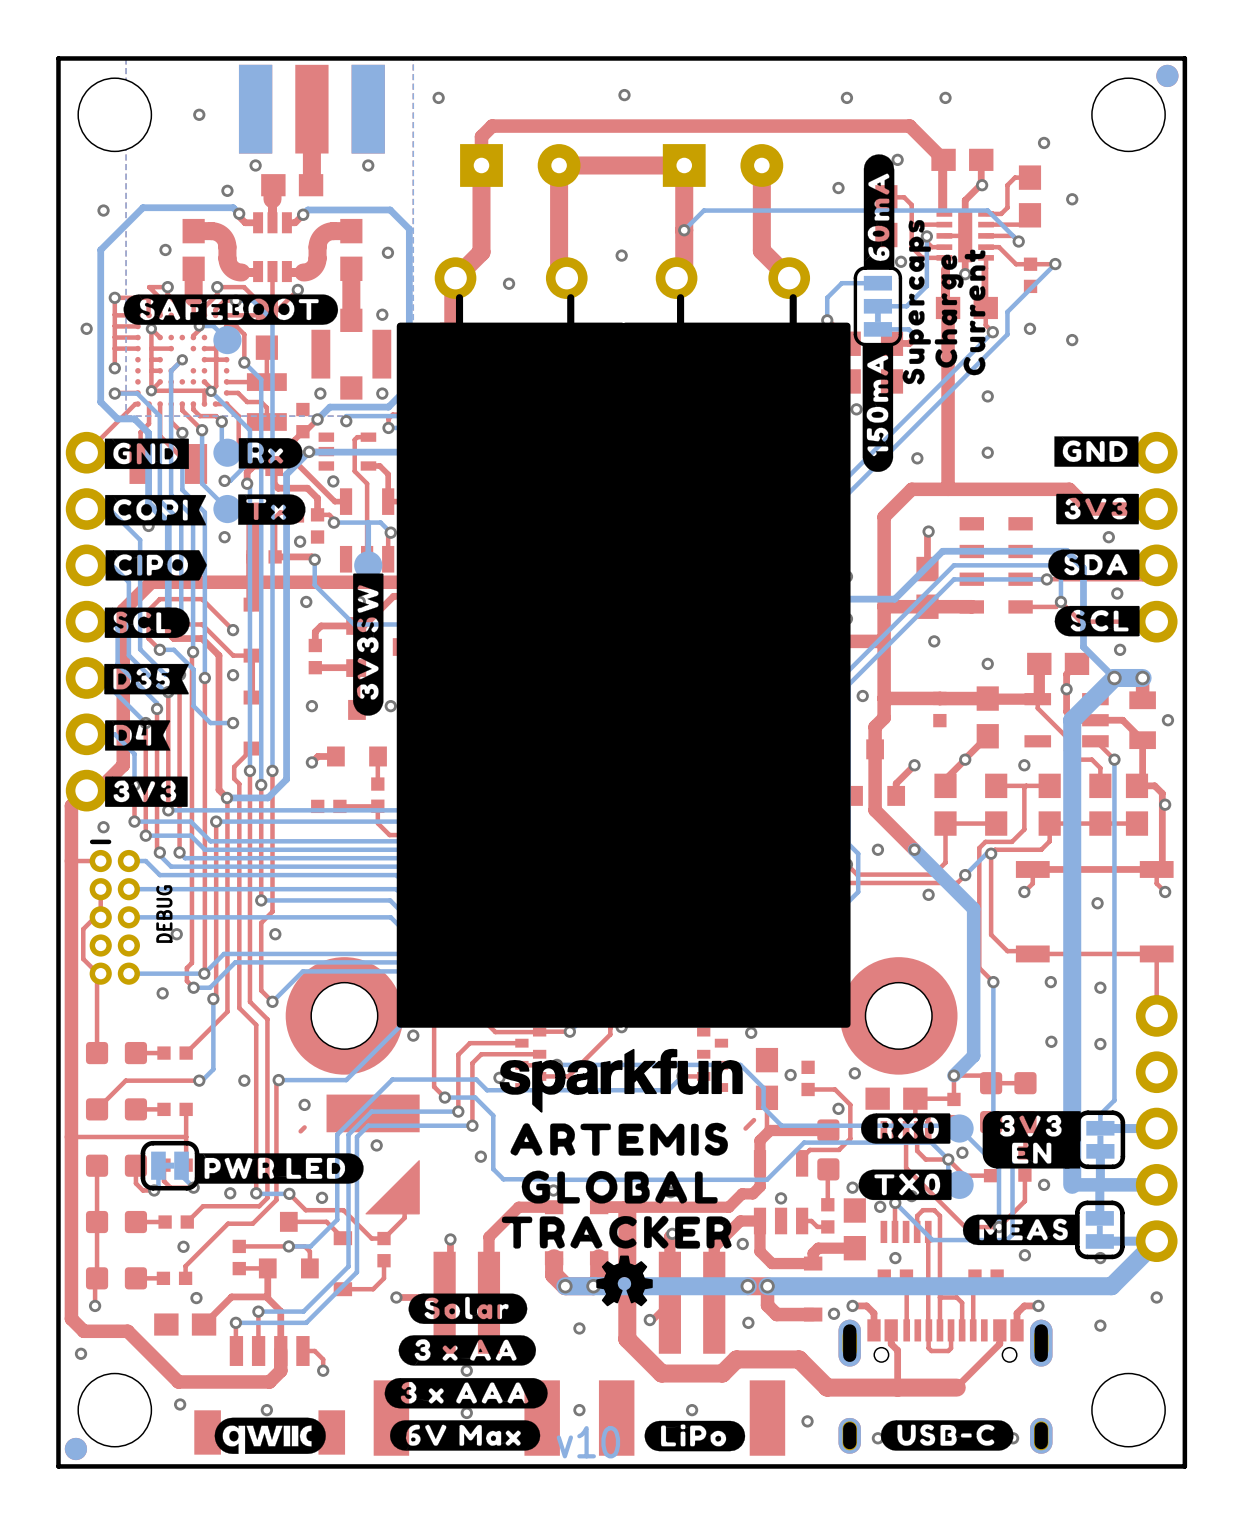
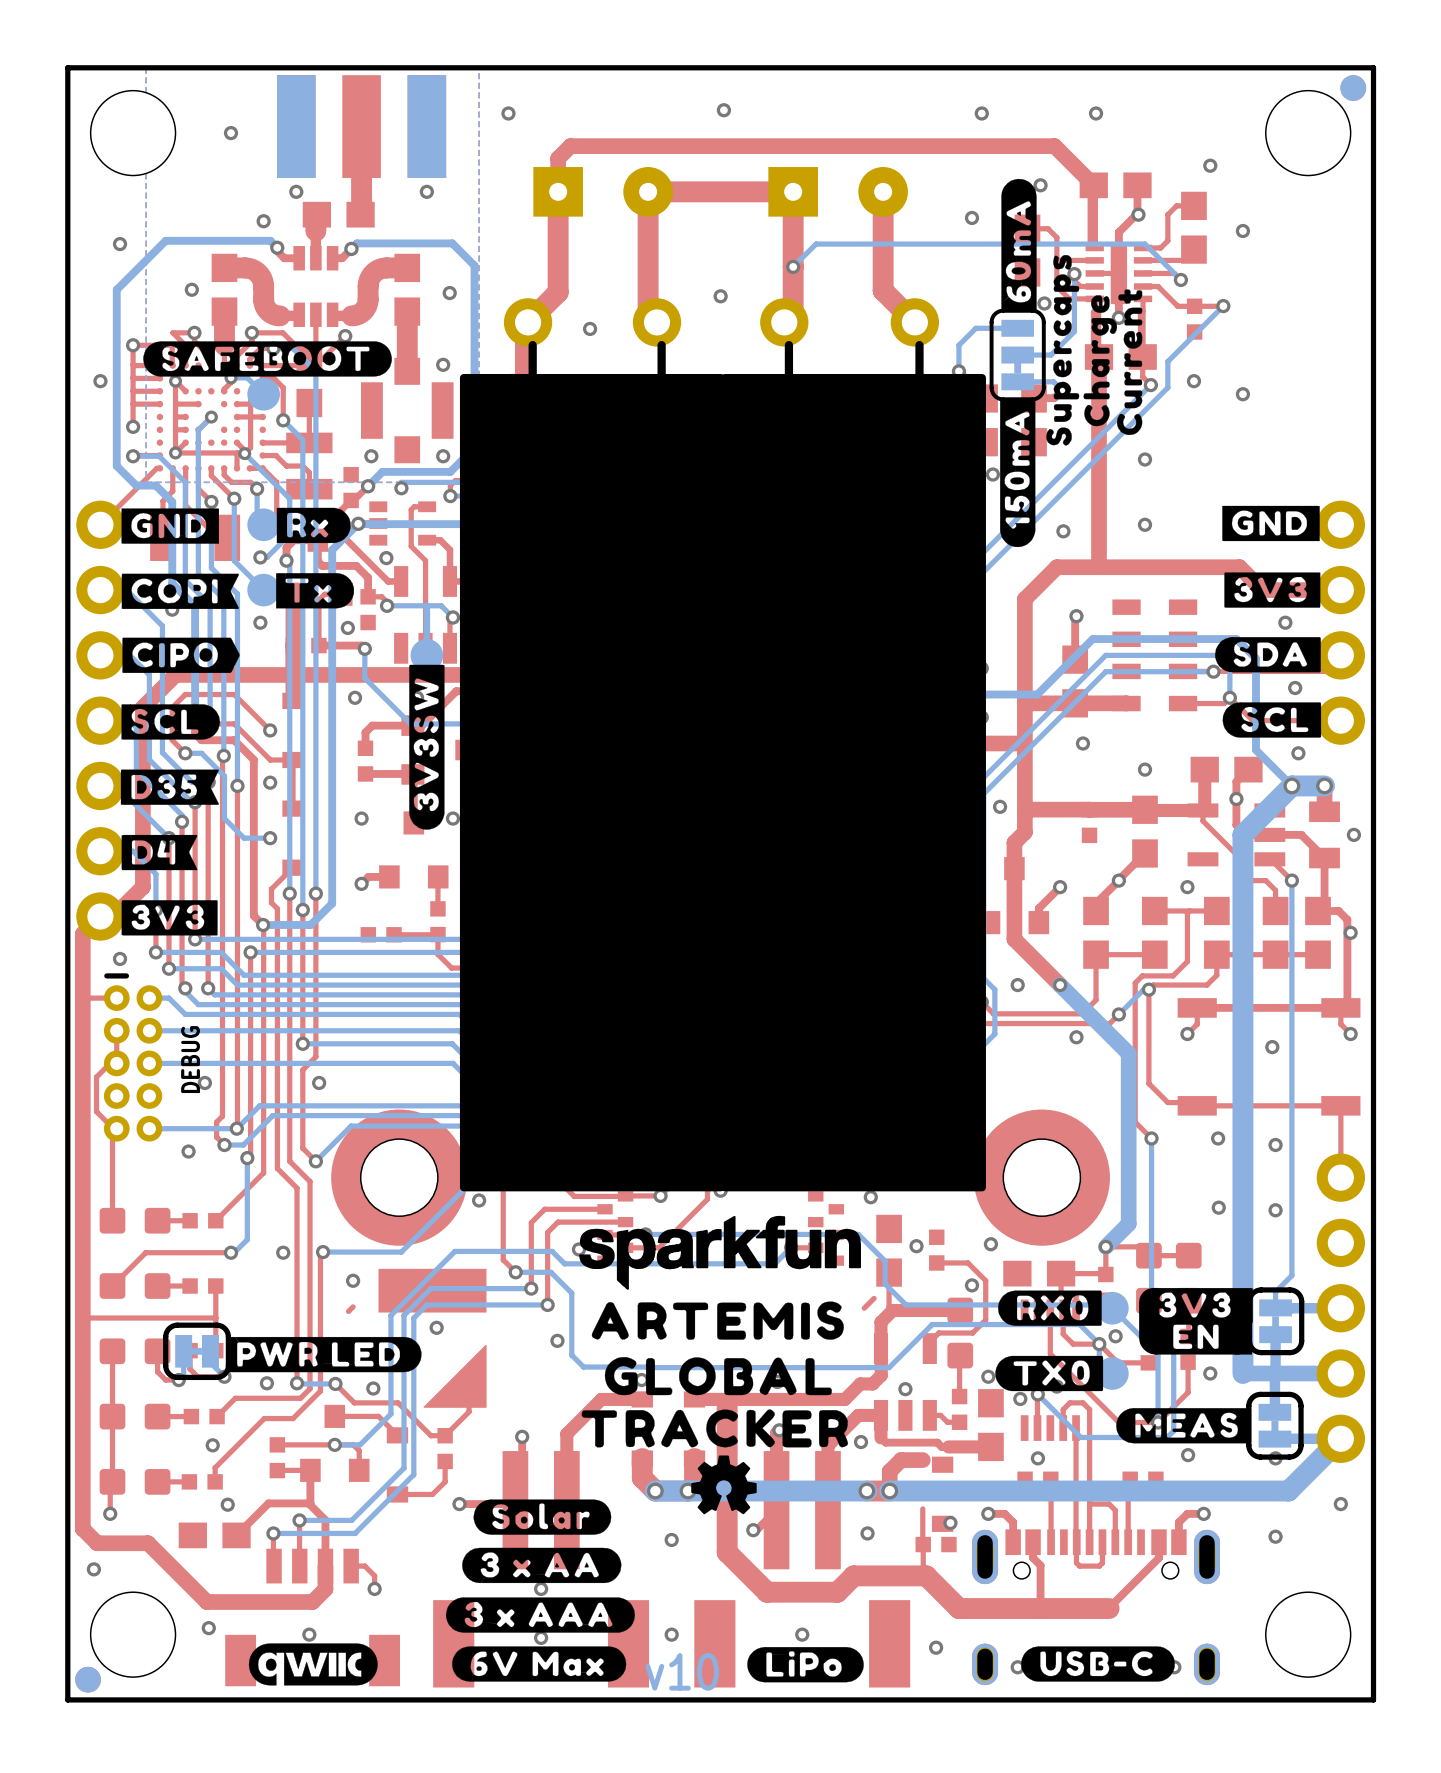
top track: (759, 1240) (759, 1251) (771, 1263) (813, 1263) (813, 1253) (818, 1248) -> (880, 1437) (885, 1442) (937, 1442) (941, 1446) (948, 1446)
top track: (767, 1286) (767, 1305) (776, 1314) (813, 1314) -> (889, 1491) (889, 1471) (901, 1460) (922, 1460)
top track: none -> (922, 1508) (922, 1572) (926, 1575)
via position: (833, 1313) -> (950, 1523)
part: none -> (936, 1544)

